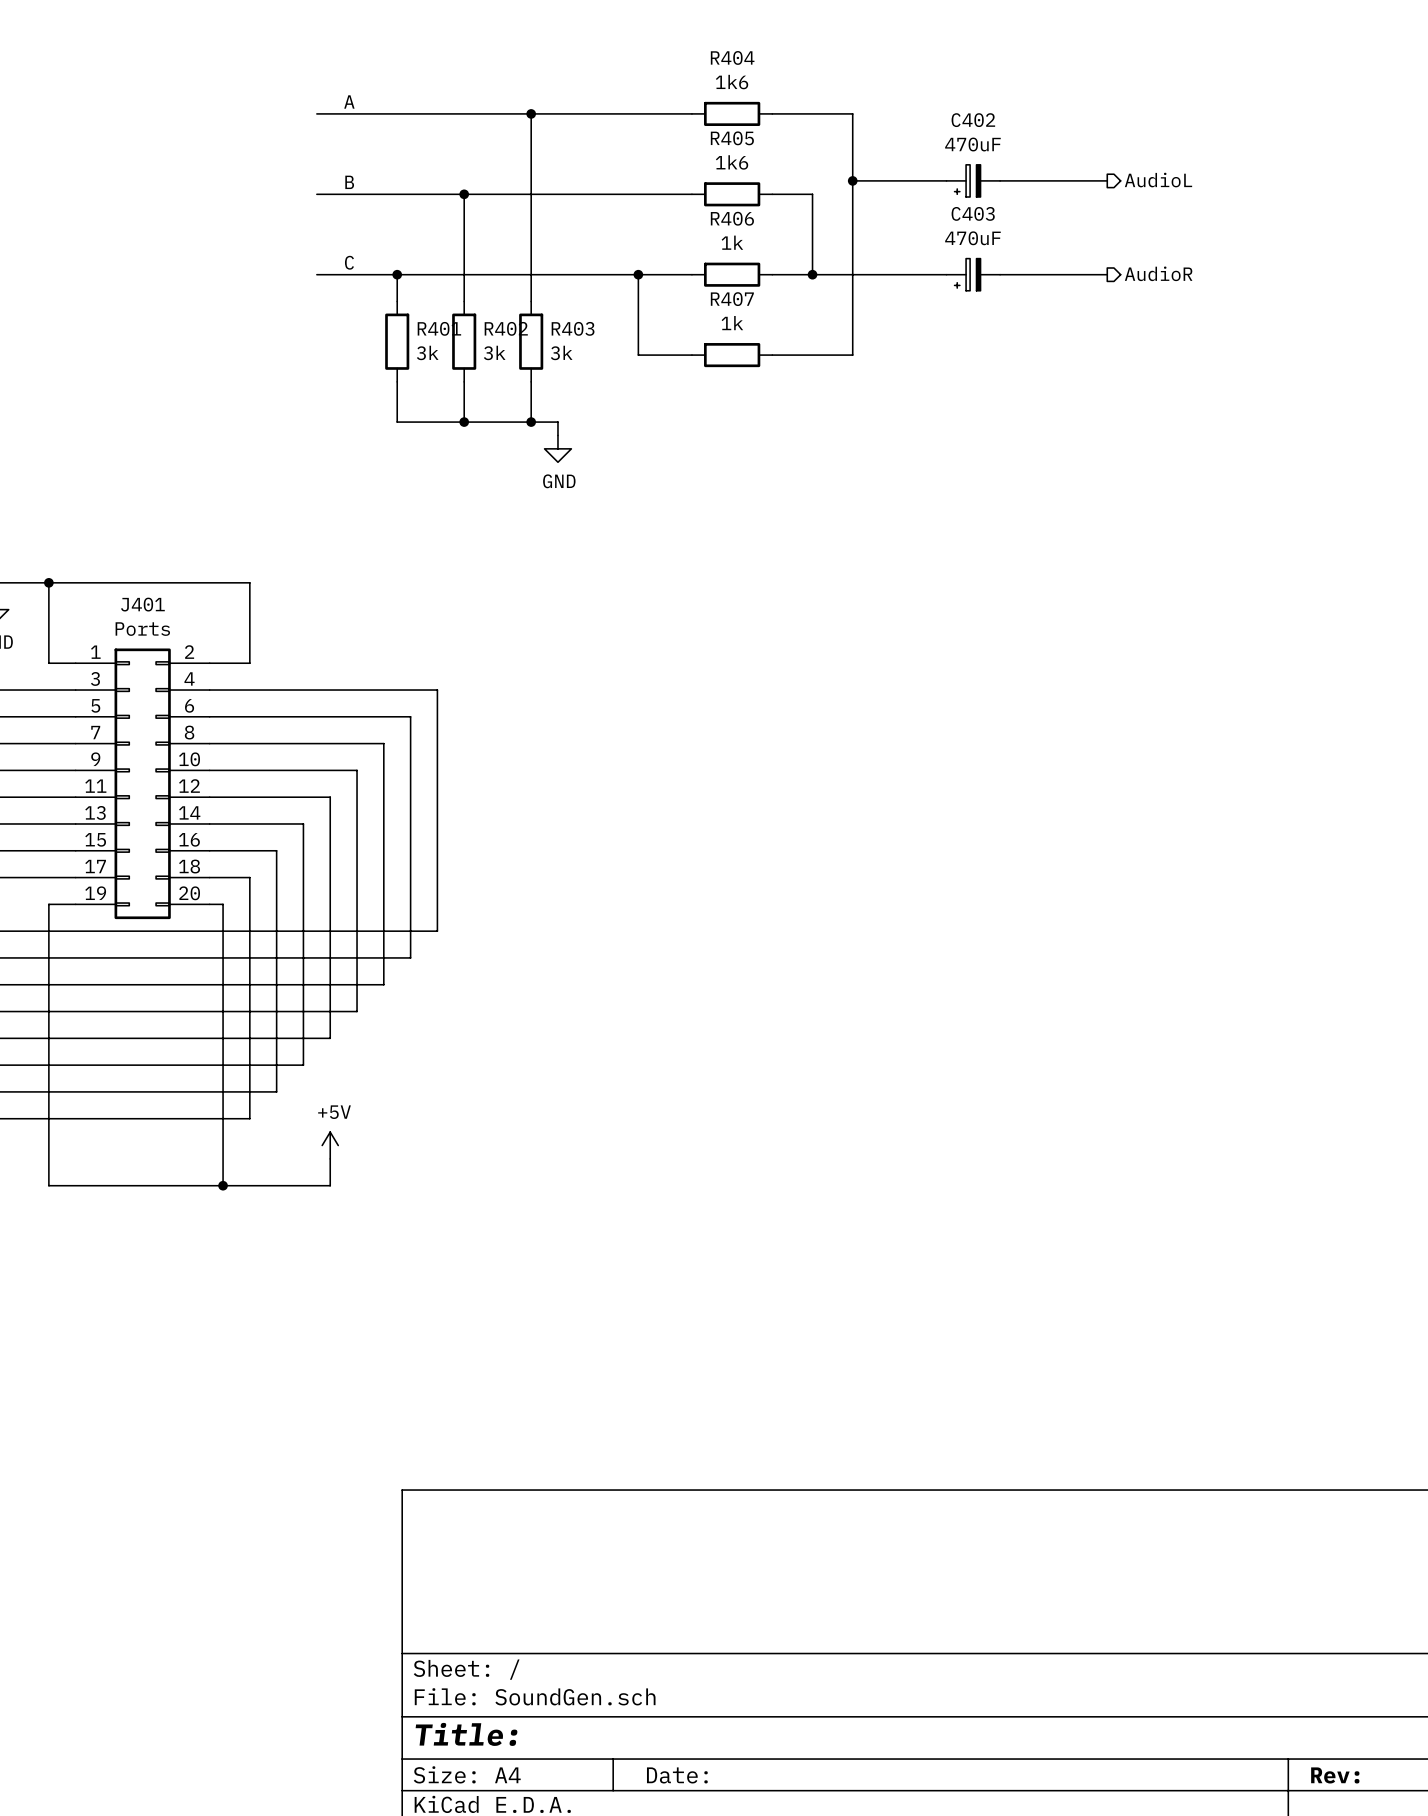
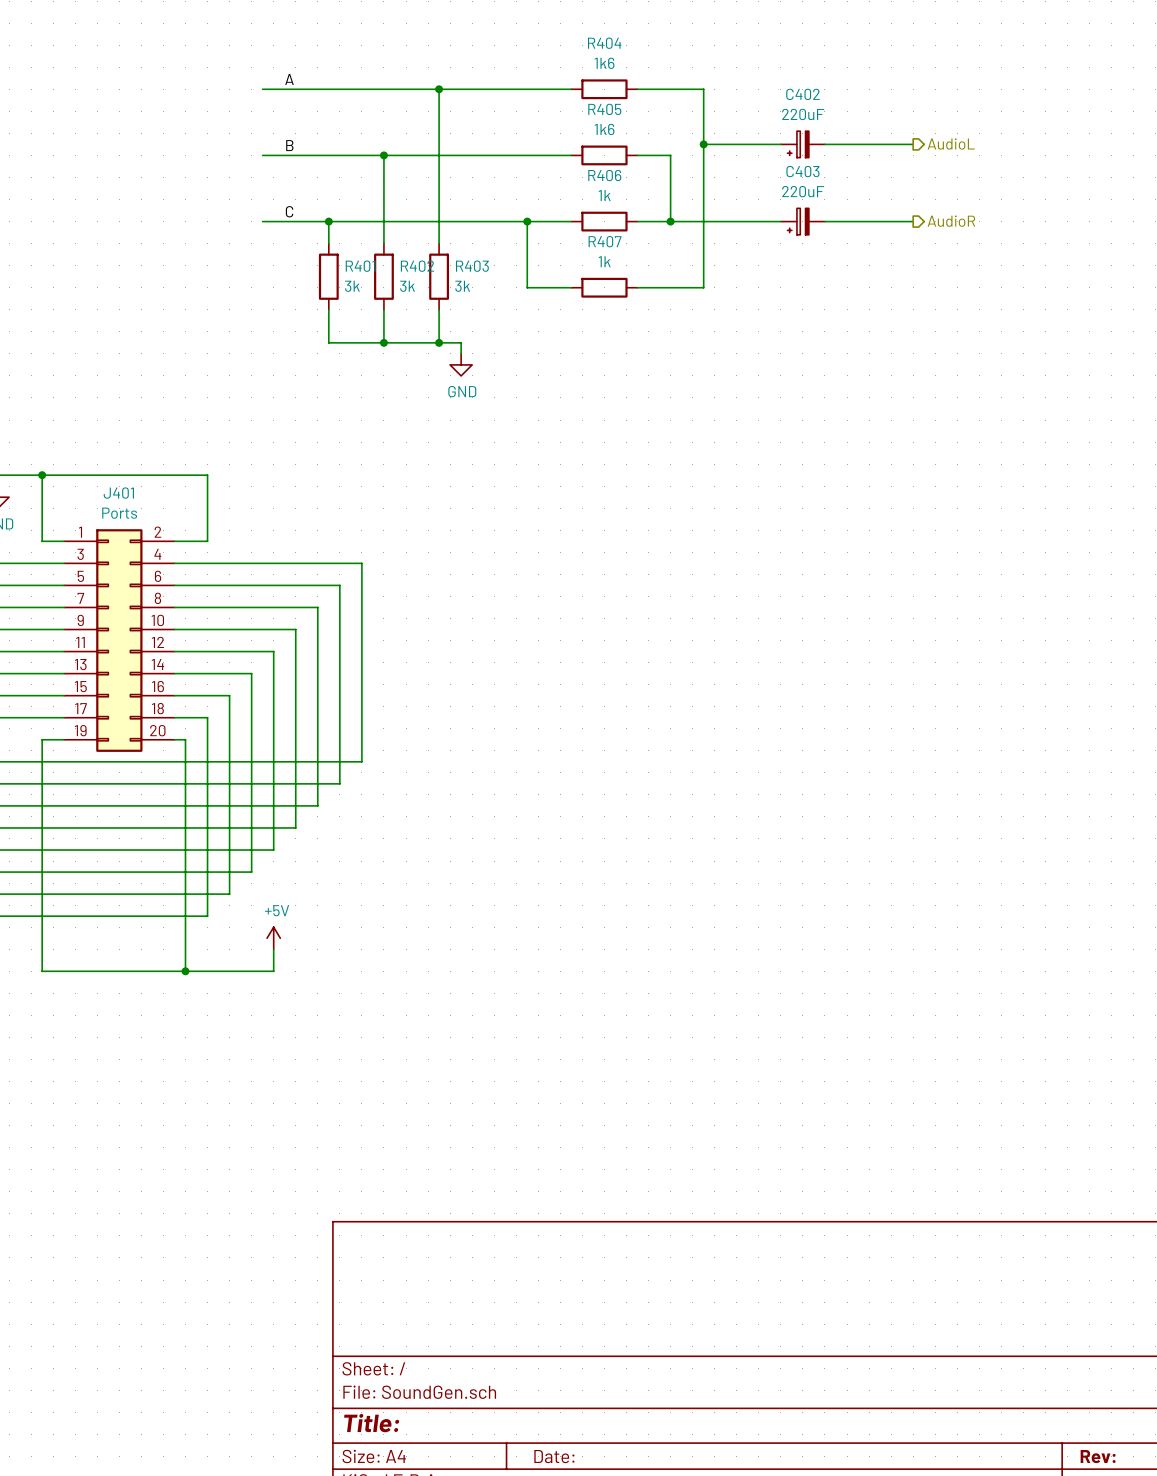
C402 value: 470uF (972, 144) -> 220uF (803, 114)
C403 value: 470uF (972, 238) -> 220uF (803, 191)

